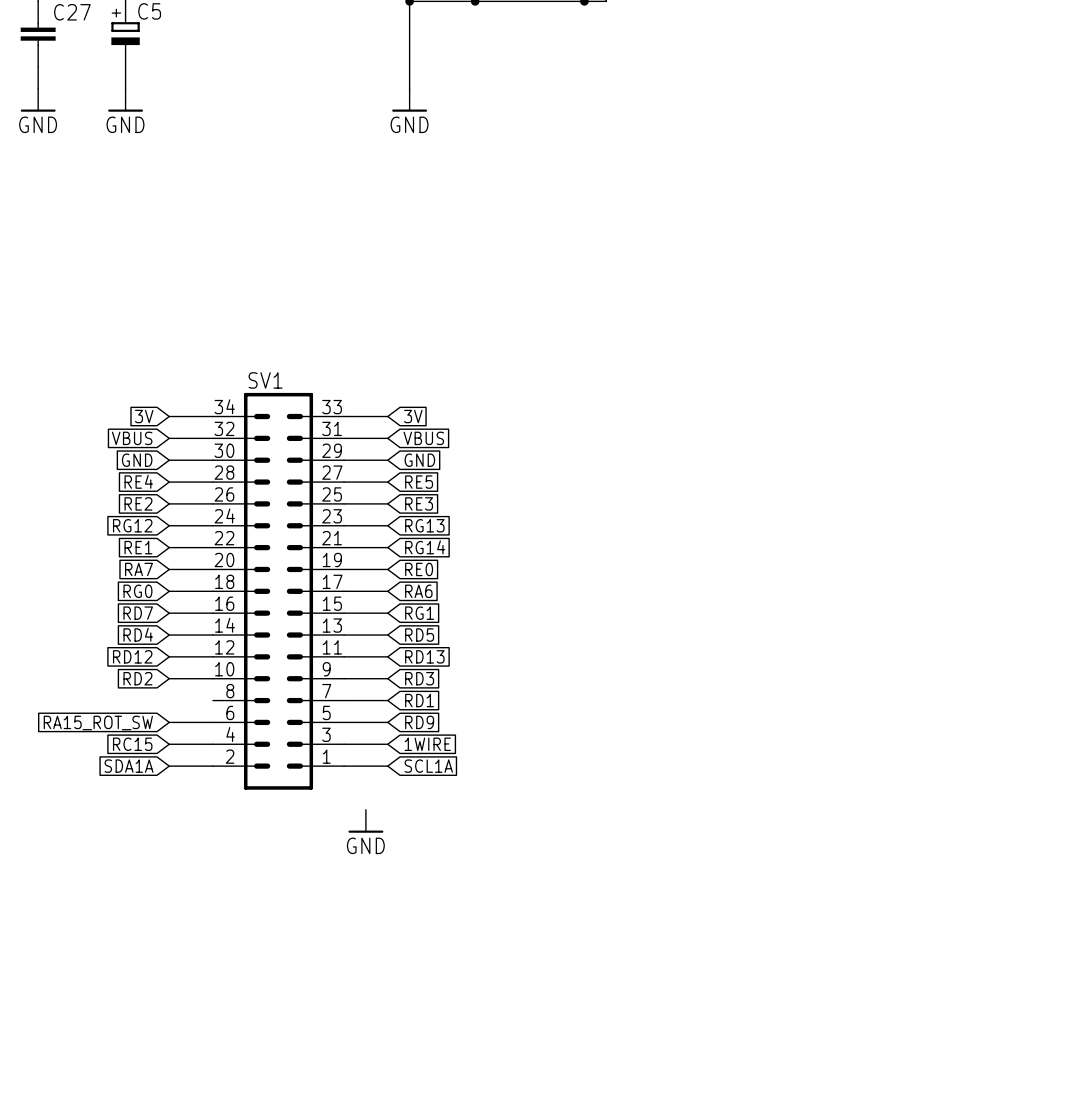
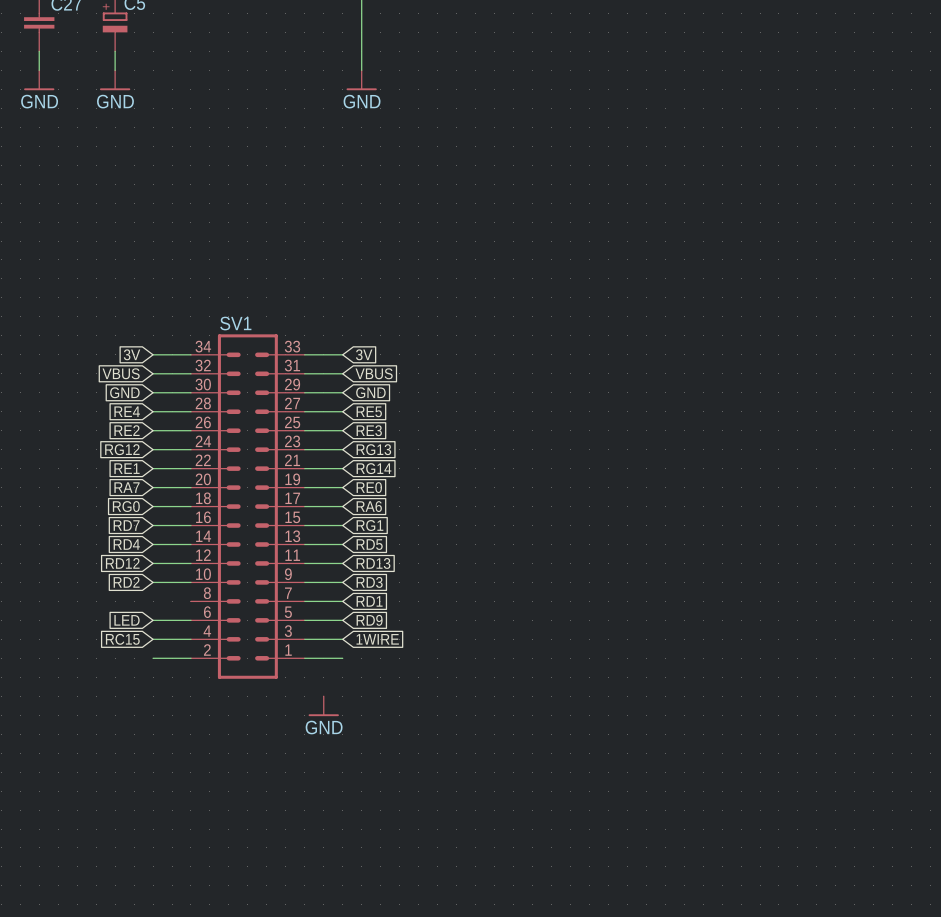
global label: RA15_ROT_SW (98, 722) -> LED (127, 620)
global label: SDA1A (129, 766) -> none
global label: SCL1A (428, 766) -> none

